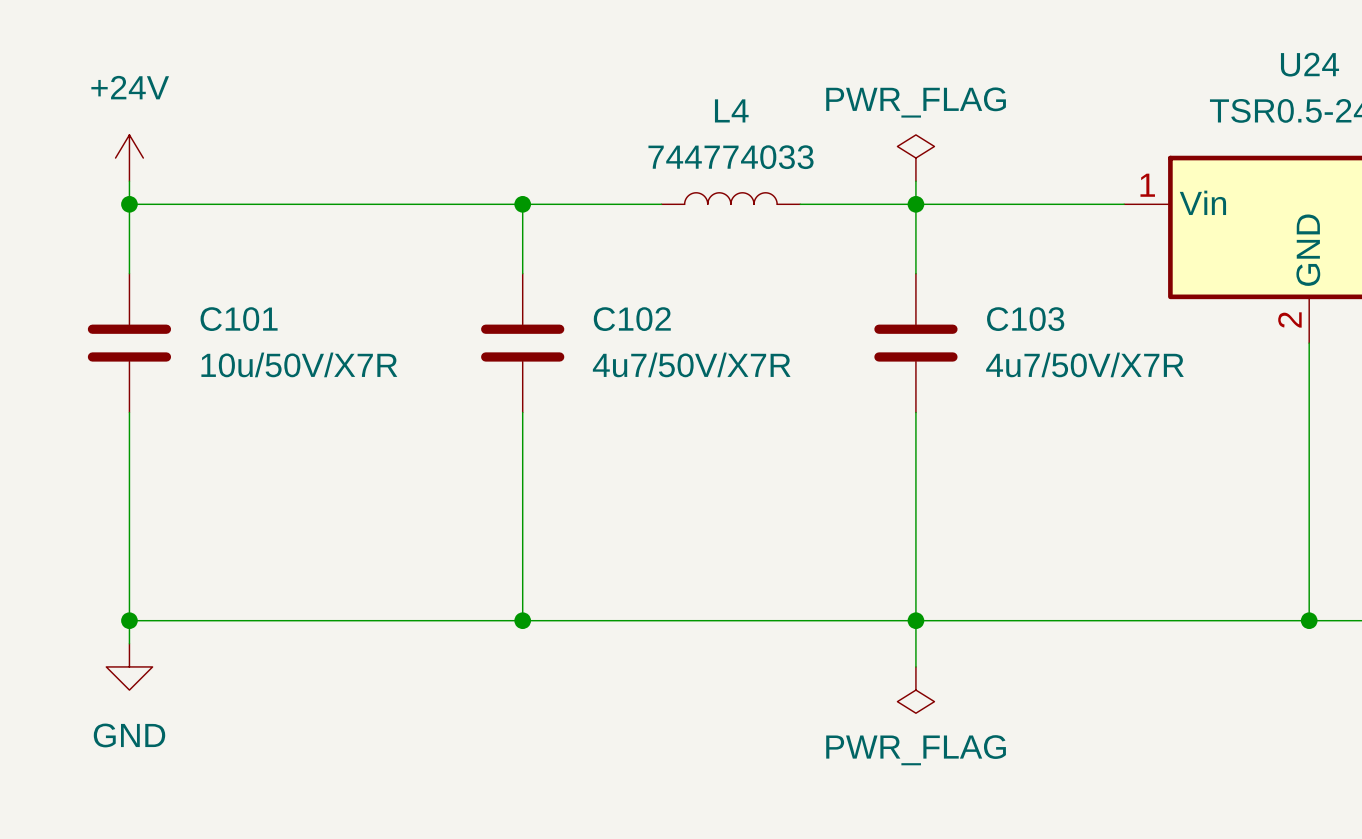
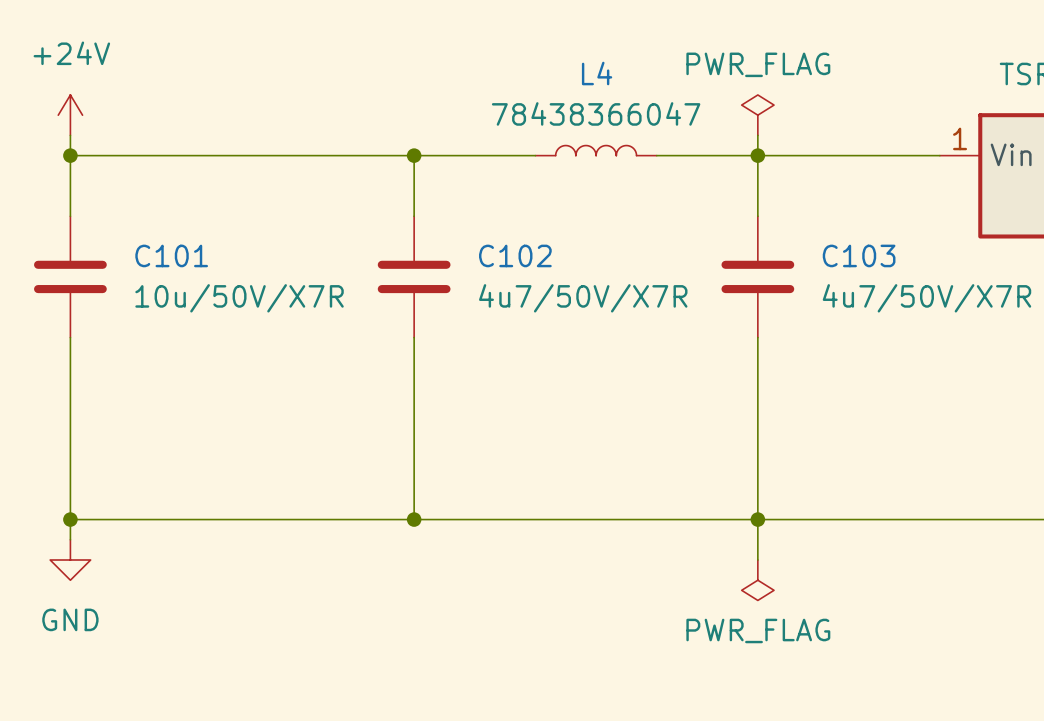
L4 value: 744774033 (731, 157) -> 78438366047 (596, 113)

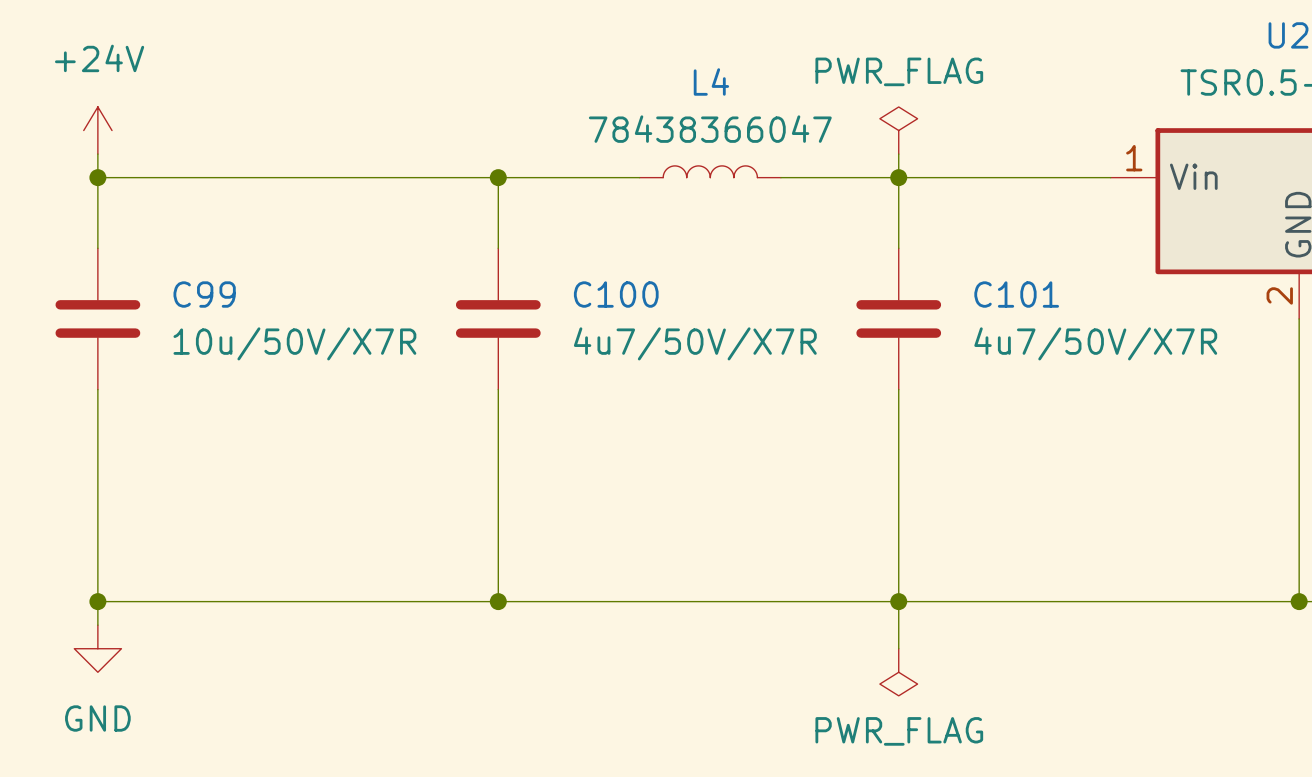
C101 name: C101 (171, 255) -> C99 (204, 294)
C102 name: C102 (515, 255) -> C100 (616, 294)
C103 name: C103 (859, 255) -> C101 (1016, 294)

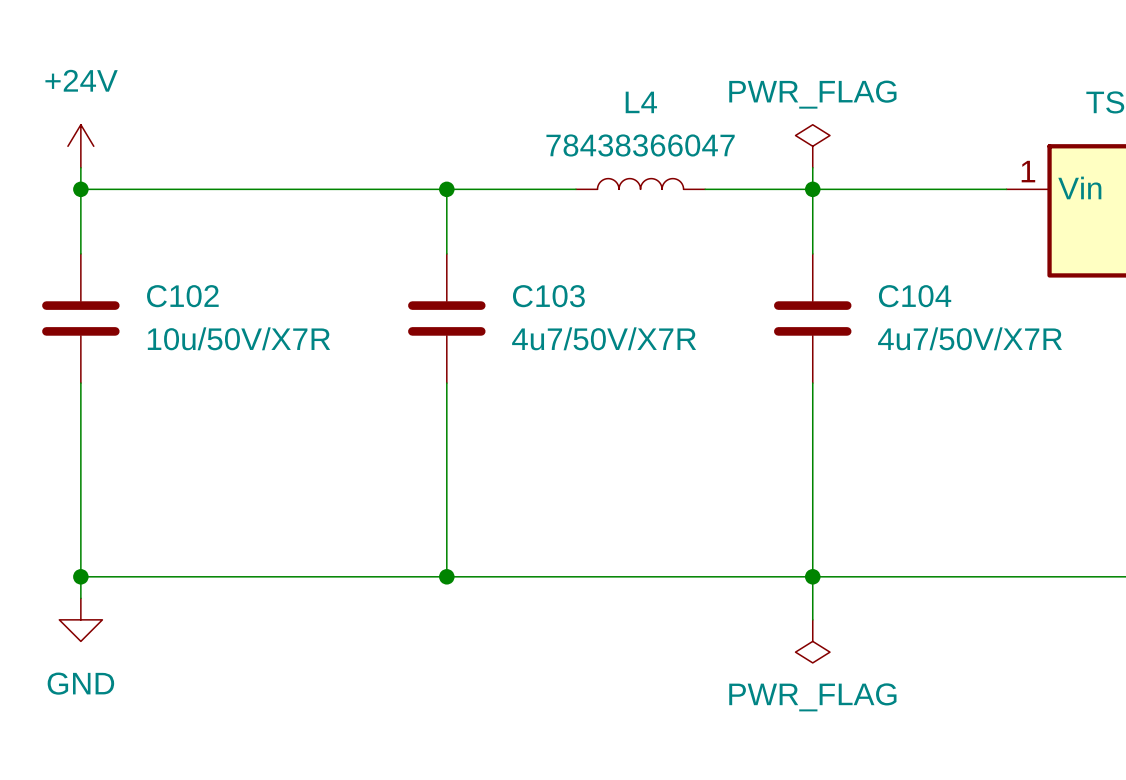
C99 name: C99 (204, 294) -> C102 (182, 296)
C100 name: C100 (616, 294) -> C103 (548, 296)
C101 name: C101 (1016, 294) -> C104 (915, 296)

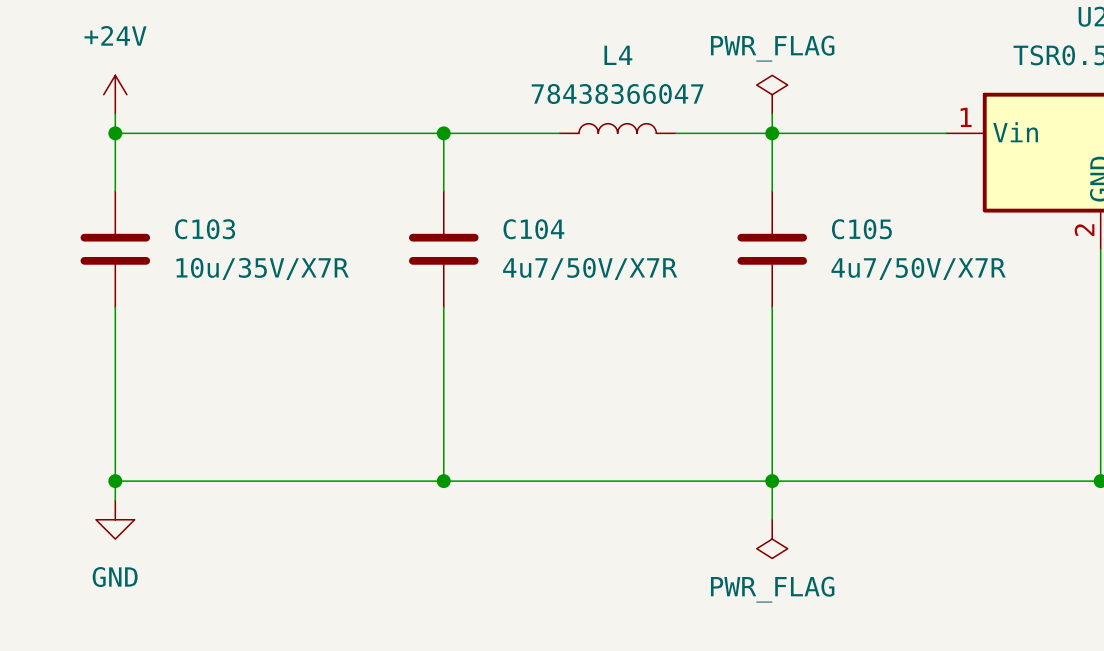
C102 name: C102 (182, 296) -> C103 (205, 229)
C103 name: C103 (548, 296) -> C104 (533, 229)
C104 name: C104 (915, 296) -> C105 (861, 229)
C102 value: 10u/50V/X7R (238, 338) -> 10u/35V/X7R (262, 268)

